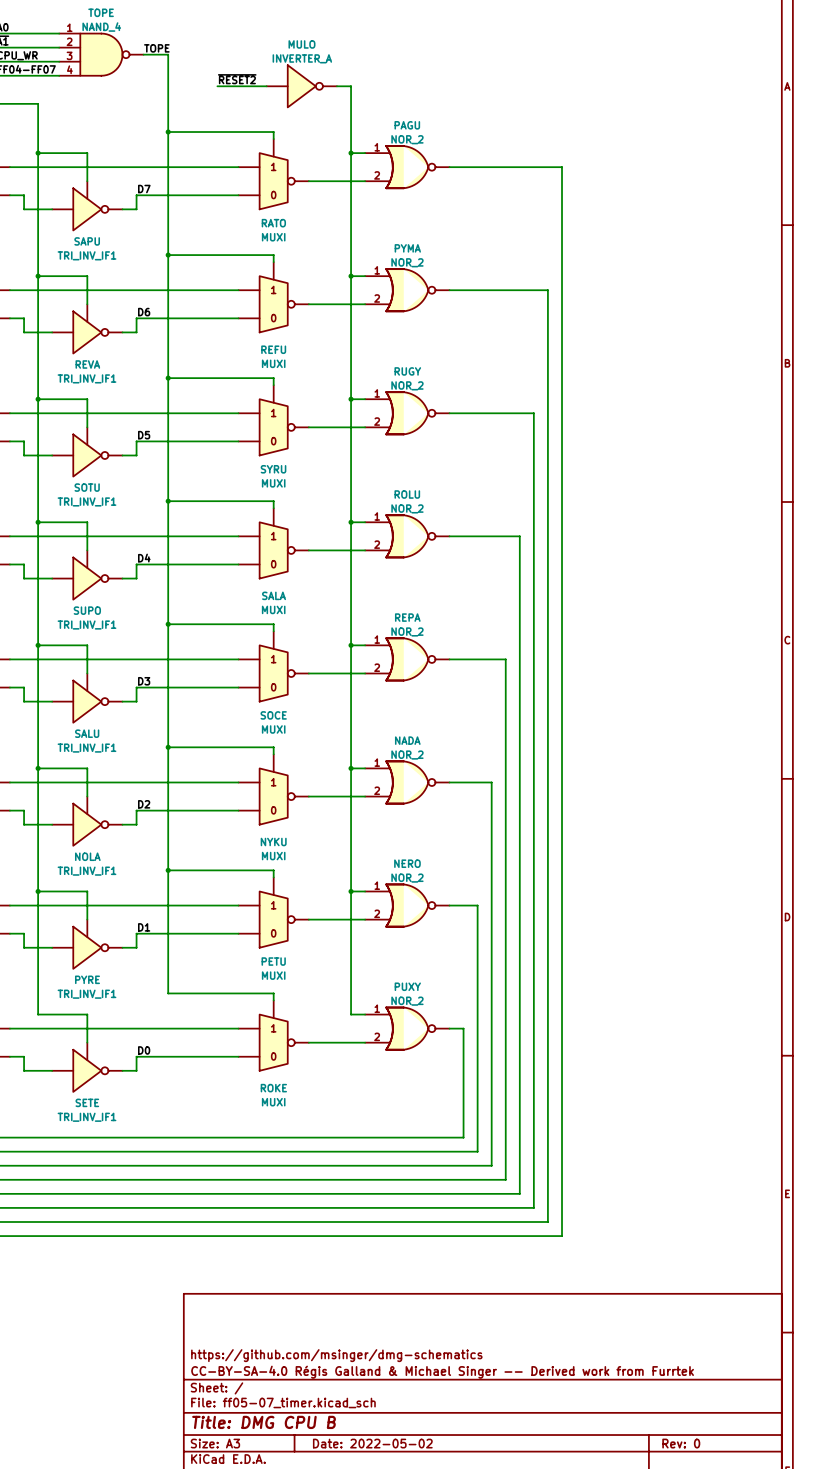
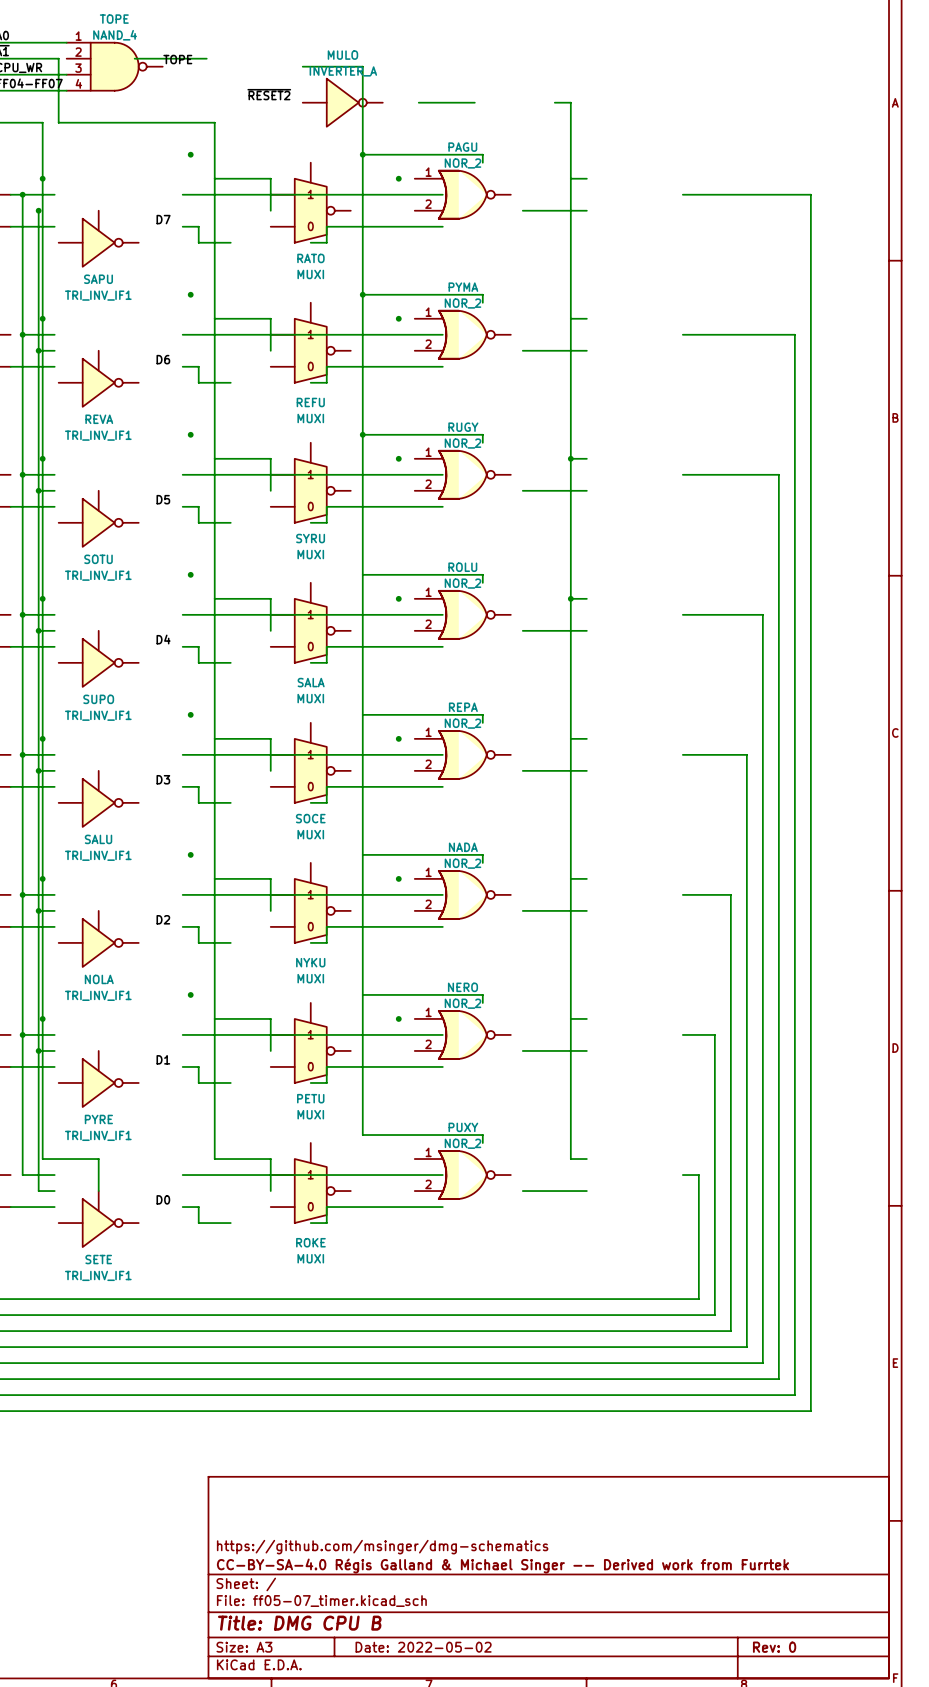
wire: (52, 47) (59, 47) -> (58, 58) (58, 122) (214, 122) (214, 1159) (270, 1159) (270, 1191)
wire: none -> (134, 58) (206, 58)
wire: (143, 54) (168, 54) (168, 993) (273, 993) (273, 1000) -> none
wire: none -> (302, 66) (362, 66) (362, 1135) (482, 1135) (482, 1143)
wire: (217, 86) (266, 86) -> none
wire: (336, 86) (351, 86) (351, 1014) (365, 1014) -> none
wire: none -> (418, 102) (474, 102)
wire: none -> (554, 102) (570, 102) (570, 1159) (586, 1159)
wire: (168, 132) (273, 132) (273, 139) -> none
wire: none -> (362, 154) (482, 154) (482, 162)
junction: none -> (362, 154)
wire: (38, 153) (87, 153) (87, 181) -> none
wire: none -> (214, 178) (270, 178) (270, 210)
wire: (351, 153) (365, 153) -> none
wire: none -> (570, 178) (586, 178)
junction: none -> (22, 194)
wire: (48, 167) (161, 167) -> none
wire: none -> (270, 194) (442, 194)
wire: (449, 167) (562, 167) (562, 1236) -> (682, 194) (810, 194) (810, 1411) (638, 1411)
wire: none -> (38, 210) (38, 1191) (54, 1191)
junction: none -> (38, 210)
wire: (308, 181) (365, 181) -> none
wire: none -> (522, 210) (586, 210)
wire: (24, 195) (24, 209) (52, 209) -> (26, 226) (54, 226)
wire: (161, 195) (136, 195) (136, 209) (122, 209) -> none
wire: (175, 195) (238, 195) -> (198, 226) (198, 242) (230, 242)
wire: none -> (442, 226) (326, 226) (326, 242) (310, 242)
wire: (168, 255) (273, 255) (273, 262) -> none
wire: none -> (362, 294) (482, 294) (482, 302)
junction: none -> (362, 294)
wire: (38, 276) (87, 276) (87, 304) -> none
wire: none -> (214, 318) (270, 318) (270, 350)
wire: (351, 276) (365, 276) -> none
wire: none -> (570, 318) (586, 318)
wire: (9, 290) (20, 290) -> none
junction: none -> (22, 334)
wire: (48, 290) (161, 290) -> none
wire: none -> (270, 334) (442, 334)
wire: (449, 290) (547, 290) (547, 1221) -> (682, 334) (794, 334) (794, 1395) (622, 1395)
wire: none -> (38, 350) (54, 350)
junction: none -> (38, 350)
wire: (308, 304) (365, 304) -> none
wire: none -> (522, 350) (586, 350)
wire: (24, 318) (24, 332) (52, 332) -> (26, 366) (54, 366)
wire: (161, 318) (136, 318) (136, 332) (122, 332) -> none
wire: (175, 318) (238, 318) -> (198, 366) (198, 382) (230, 382)
wire: none -> (442, 366) (326, 366) (326, 382) (310, 382)
wire: (168, 378) (273, 378) (273, 385) -> none
wire: none -> (362, 434) (482, 434) (482, 442)
junction: none -> (362, 434)
wire: (38, 399) (87, 399) (87, 427) -> none
wire: none -> (214, 458) (270, 458) (270, 490)
wire: (351, 399) (365, 399) -> none
wire: none -> (570, 458) (586, 458)
junction: none -> (570, 458)
wire: (9, 413) (20, 413) -> none
junction: none -> (22, 474)
wire: (48, 413) (161, 413) -> none
wire: none -> (270, 474) (442, 474)
wire: (449, 413) (533, 413) (533, 1207) -> (682, 474) (778, 474) (778, 1379) (606, 1379)
wire: none -> (38, 490) (54, 490)
junction: none -> (38, 490)
wire: (308, 427) (365, 427) -> none
wire: none -> (522, 490) (586, 490)
wire: (24, 441) (24, 455) (52, 455) -> (26, 506) (54, 506)
wire: (161, 441) (136, 441) (136, 455) (122, 455) -> none
wire: (175, 441) (238, 441) -> (198, 506) (198, 522) (230, 522)
wire: none -> (442, 506) (326, 506) (326, 522) (310, 522)
wire: (168, 501) (273, 501) (273, 508) -> none
wire: none -> (362, 574) (482, 574) (482, 582)
wire: (38, 522) (87, 522) (87, 550) -> none
wire: none -> (214, 598) (270, 598) (270, 630)
wire: (351, 522) (365, 522) -> none
wire: none -> (570, 598) (586, 598)
junction: none -> (570, 598)
wire: (9, 536) (20, 536) -> none
junction: none -> (22, 614)
wire: (48, 536) (161, 536) -> none
wire: none -> (270, 614) (442, 614)
wire: (449, 536) (519, 536) (519, 1193) -> (682, 614) (762, 614) (762, 1363) (590, 1363)
wire: none -> (38, 630) (54, 630)
junction: none -> (38, 630)
wire: (308, 550) (365, 550) -> none
wire: none -> (522, 630) (586, 630)
wire: (24, 564) (24, 578) (52, 578) -> (26, 646) (54, 646)
wire: (161, 564) (136, 564) (136, 578) (122, 578) -> none
wire: (175, 564) (238, 564) -> (198, 646) (198, 662) (230, 662)
wire: none -> (442, 646) (326, 646) (326, 662) (310, 662)
wire: (168, 624) (273, 624) (273, 631) -> none
wire: none -> (362, 714) (482, 714) (482, 722)
wire: (38, 645) (87, 645) (87, 673) -> none
wire: none -> (214, 738) (270, 738) (270, 770)
wire: (351, 645) (365, 645) -> none
wire: none -> (570, 738) (586, 738)
wire: (9, 659) (20, 659) -> none
junction: none -> (22, 754)
wire: (48, 659) (161, 659) -> none
wire: none -> (270, 754) (442, 754)
wire: (449, 659) (505, 659) (505, 1179) -> (682, 754) (746, 754) (746, 1347) (574, 1347)
wire: none -> (38, 770) (54, 770)
junction: none -> (38, 770)
wire: (308, 673) (365, 673) -> none
wire: none -> (522, 770) (586, 770)
wire: (24, 687) (24, 701) (52, 701) -> (26, 786) (54, 786)
wire: (161, 687) (136, 687) (136, 701) (122, 701) -> none
wire: (175, 687) (238, 687) -> (198, 786) (198, 802) (230, 802)
wire: none -> (442, 786) (326, 786) (326, 802) (310, 802)
wire: (168, 747) (273, 747) (273, 754) -> none
wire: none -> (362, 854) (482, 854) (482, 862)
wire: (38, 768) (87, 768) (87, 796) -> none
wire: none -> (214, 878) (270, 878) (270, 910)
wire: (351, 768) (365, 768) -> none
wire: none -> (570, 878) (586, 878)
wire: (9, 782) (20, 782) -> none
junction: none -> (22, 894)
wire: (48, 782) (161, 782) -> none
wire: none -> (270, 894) (442, 894)
wire: (449, 782) (491, 782) (491, 1165) -> (682, 894) (730, 894) (730, 1331) (558, 1331)
wire: none -> (38, 910) (54, 910)
junction: none -> (38, 910)
wire: (308, 796) (365, 796) -> none
wire: none -> (522, 910) (586, 910)
wire: (24, 810) (24, 824) (52, 824) -> (26, 926) (54, 926)
wire: (161, 810) (136, 810) (136, 824) (122, 824) -> none
wire: (175, 810) (238, 810) -> (198, 926) (198, 942) (230, 942)
wire: none -> (442, 926) (326, 926) (326, 942) (310, 942)
wire: (168, 870) (273, 870) (273, 877) -> none
wire: none -> (362, 994) (482, 994) (482, 1002)
wire: (38, 891) (87, 891) (87, 919) -> none
wire: none -> (214, 1018) (270, 1018) (270, 1050)
wire: (351, 891) (365, 891) -> none
wire: none -> (570, 1018) (586, 1018)
wire: (9, 905) (20, 905) -> none
junction: none -> (22, 1034)
wire: (48, 905) (161, 905) -> none
wire: none -> (270, 1034) (442, 1034)
wire: (449, 905) (477, 905) (477, 1151) -> (682, 1034) (714, 1034) (714, 1315) (542, 1315)
wire: none -> (38, 1050) (54, 1050)
junction: none -> (38, 1050)
wire: (308, 919) (365, 919) -> none
wire: none -> (522, 1050) (586, 1050)
wire: (24, 933) (24, 947) (52, 947) -> (26, 1066) (54, 1066)
wire: (161, 933) (136, 933) (136, 947) (122, 947) -> none
wire: (175, 933) (238, 933) -> (198, 1066) (198, 1082) (230, 1082)
wire: none -> (442, 1066) (326, 1066) (326, 1082) (310, 1082)
wire: (9, 1028) (20, 1028) -> (22, 194) (22, 1175)
wire: (48, 1028) (161, 1028) -> none
wire: none -> (270, 1175) (442, 1175)
wire: (449, 1028) (463, 1028) (463, 1137) -> (682, 1175) (698, 1175) (698, 1299) (526, 1299)
wire: (308, 1042) (365, 1042) -> none
wire: none -> (522, 1191) (586, 1191)
wire: (24, 1056) (24, 1070) (52, 1070) -> (26, 1207) (54, 1207)
wire: (161, 1056) (136, 1056) (136, 1070) (122, 1070) -> none
wire: (175, 1056) (238, 1056) -> (198, 1207) (198, 1223) (230, 1223)
wire: none -> (442, 1207) (326, 1207) (326, 1223) (310, 1223)

